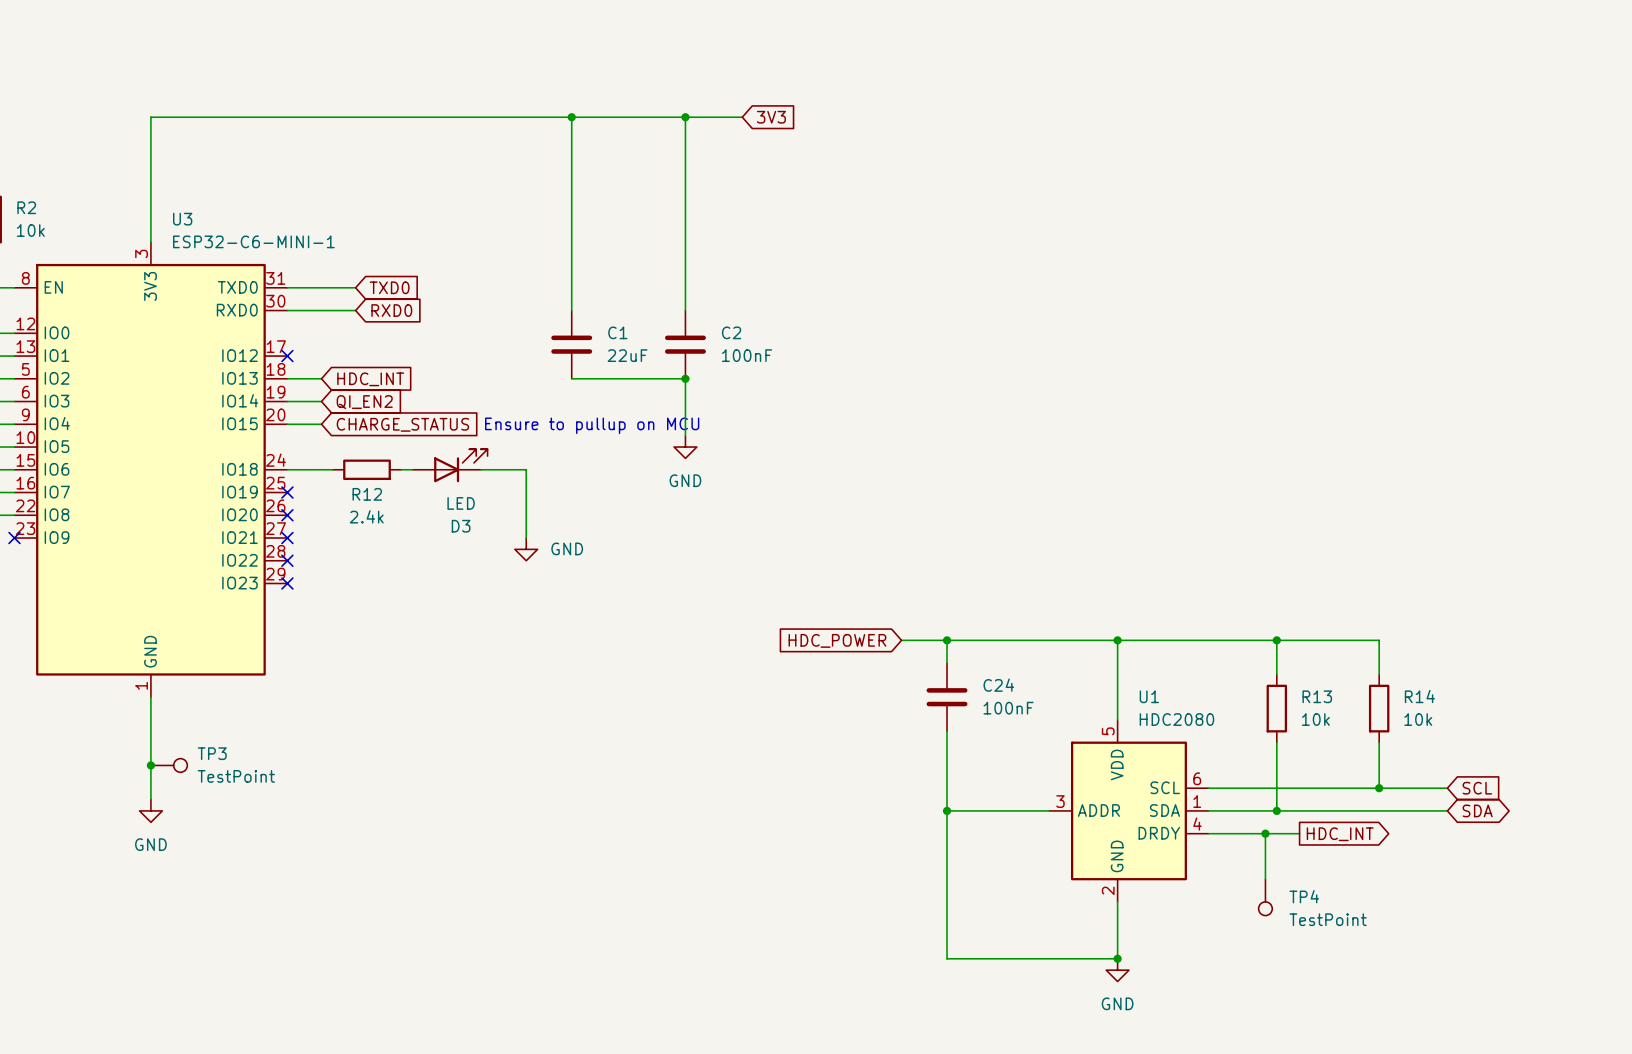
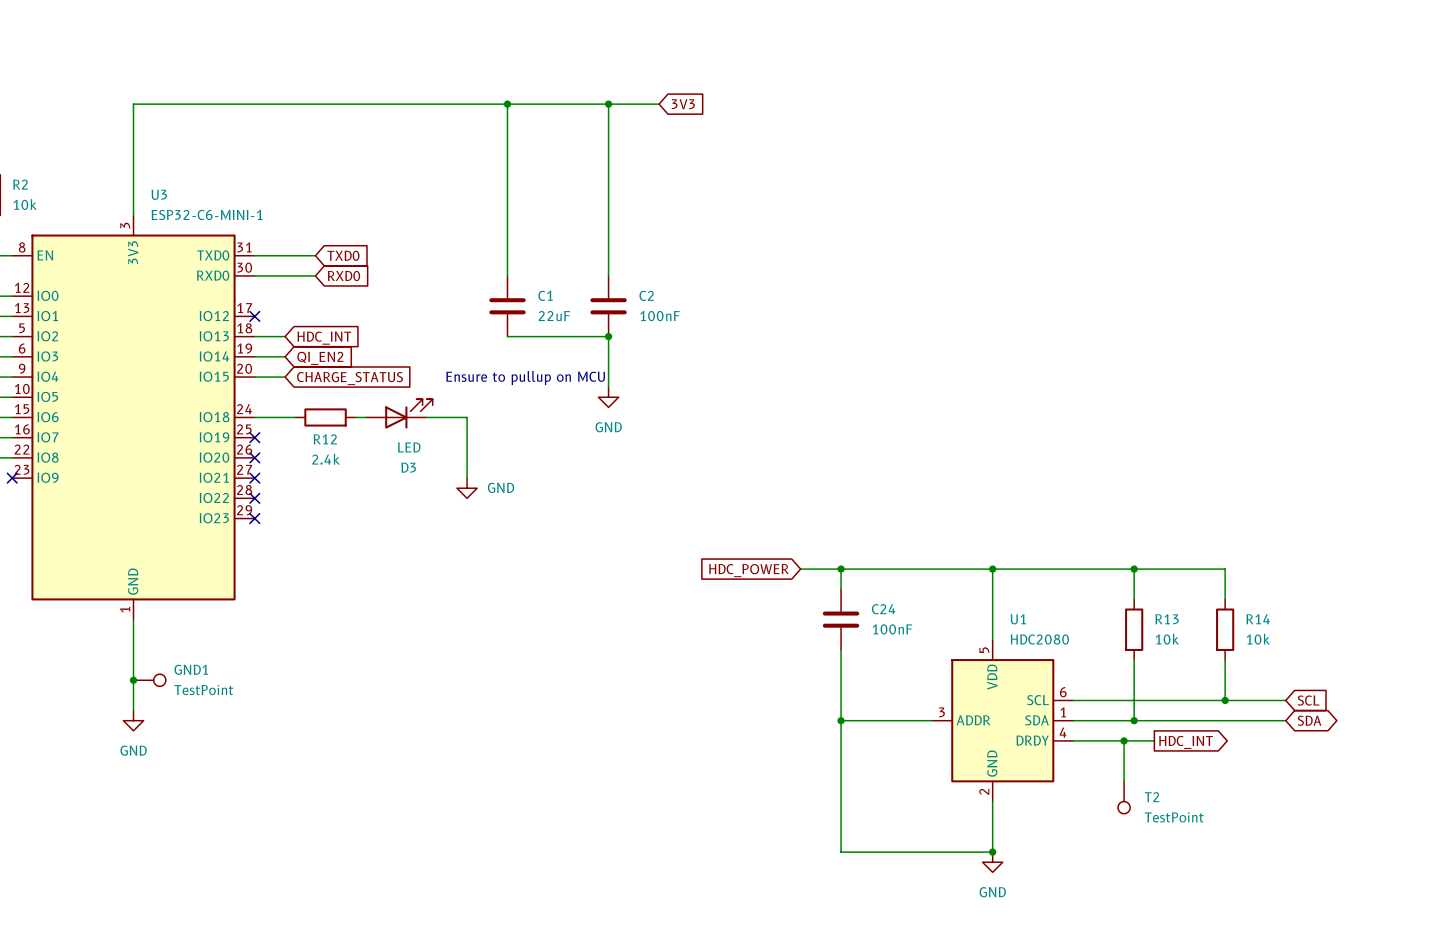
TP3 name: TP3 (212, 753) -> GND1 (191, 669)
TP4 name: TP4 (1304, 896) -> T2 (1152, 797)

